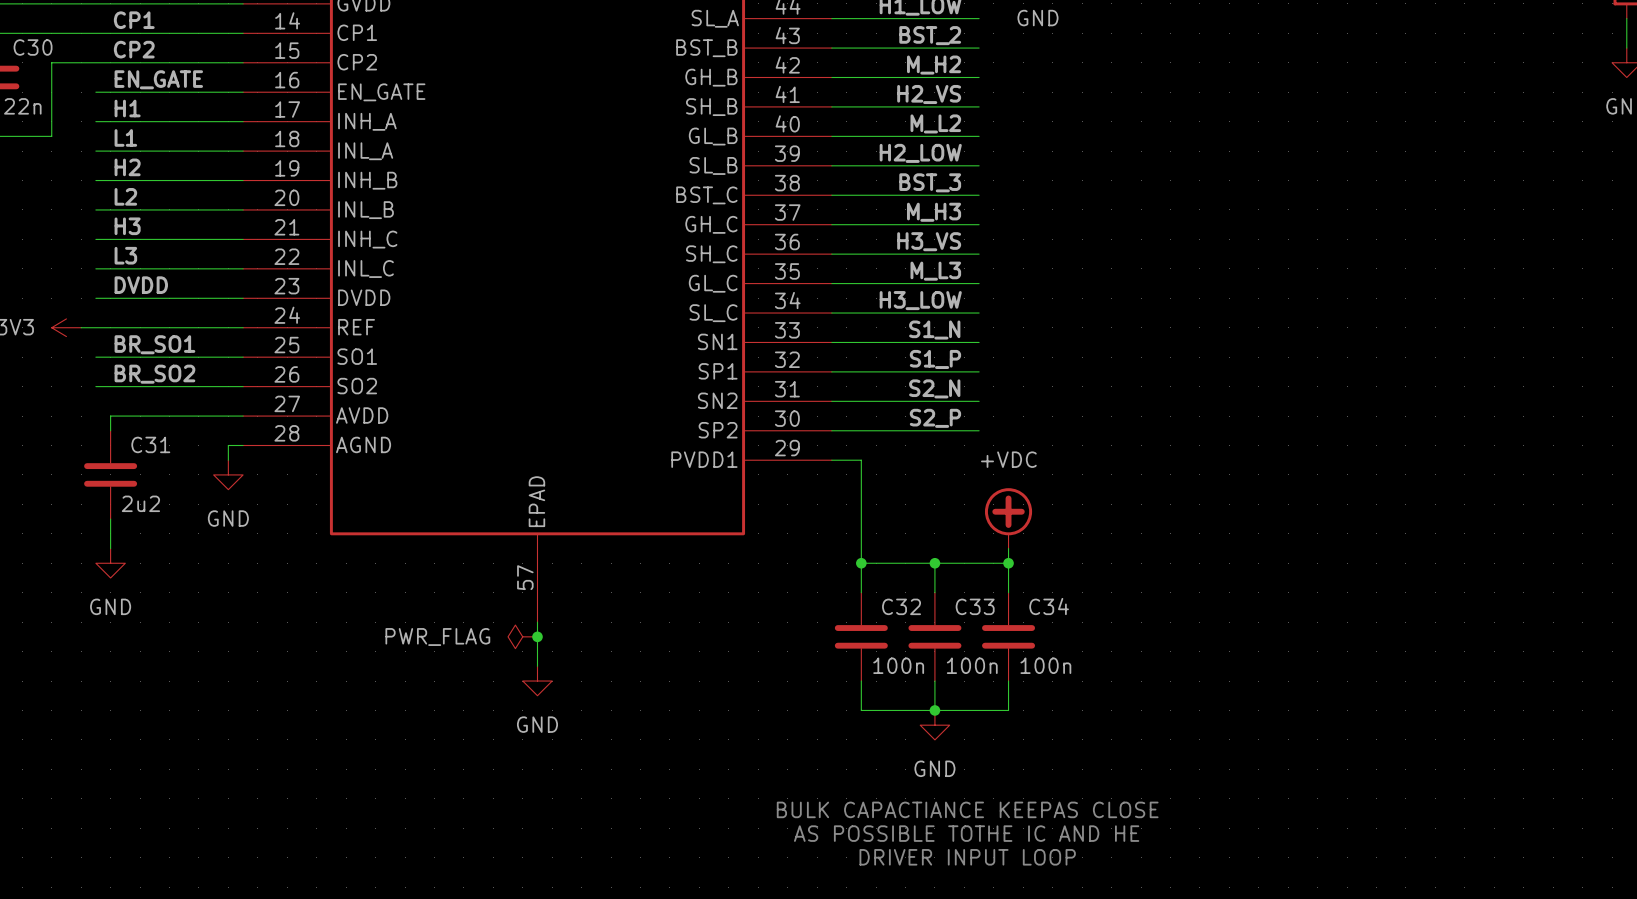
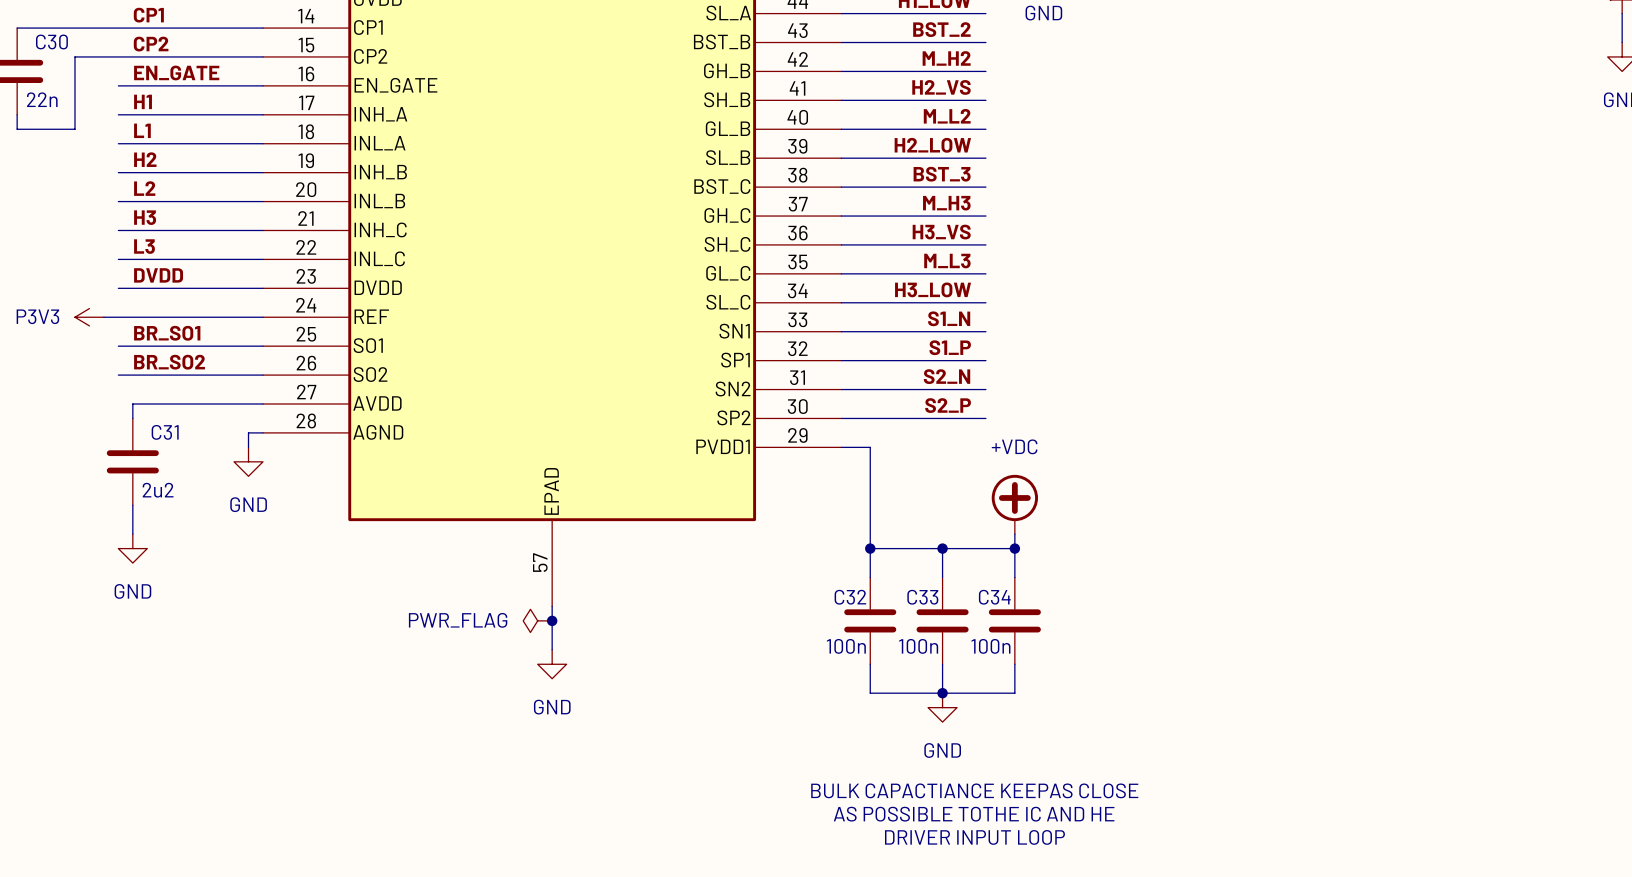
C32 name position: C32 (901, 606) -> C32 (850, 597)
C33 name position: C33 (975, 606) -> C33 (922, 597)
C34 name position: C34 (1049, 606) -> C34 (994, 597)
C32 value position: 100n (898, 665) -> 100n (846, 646)
C33 value position: 100n (972, 665) -> 100n (918, 646)
C34 value position: 100n (1045, 665) -> 100n (990, 646)

